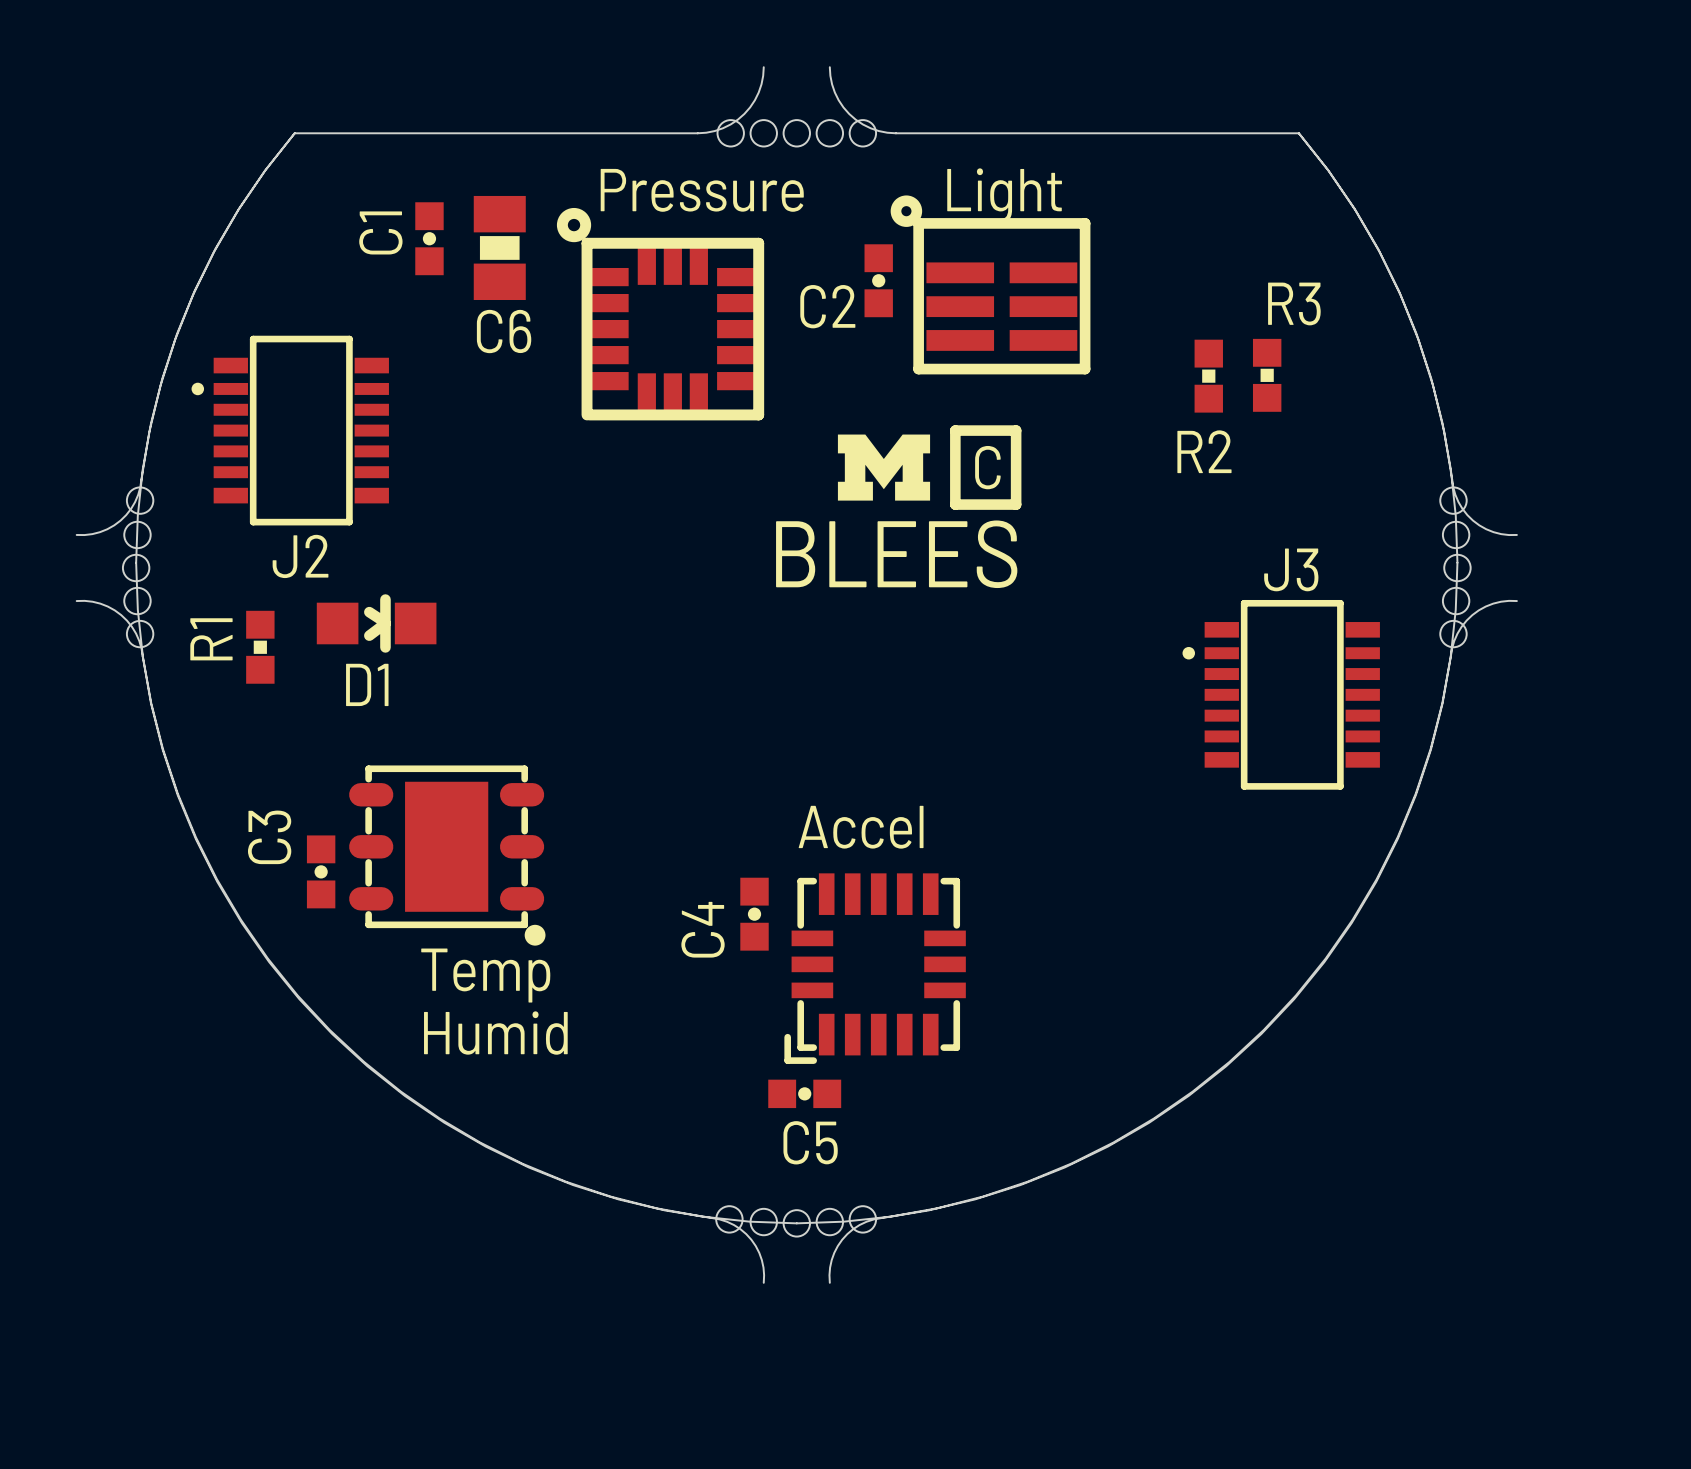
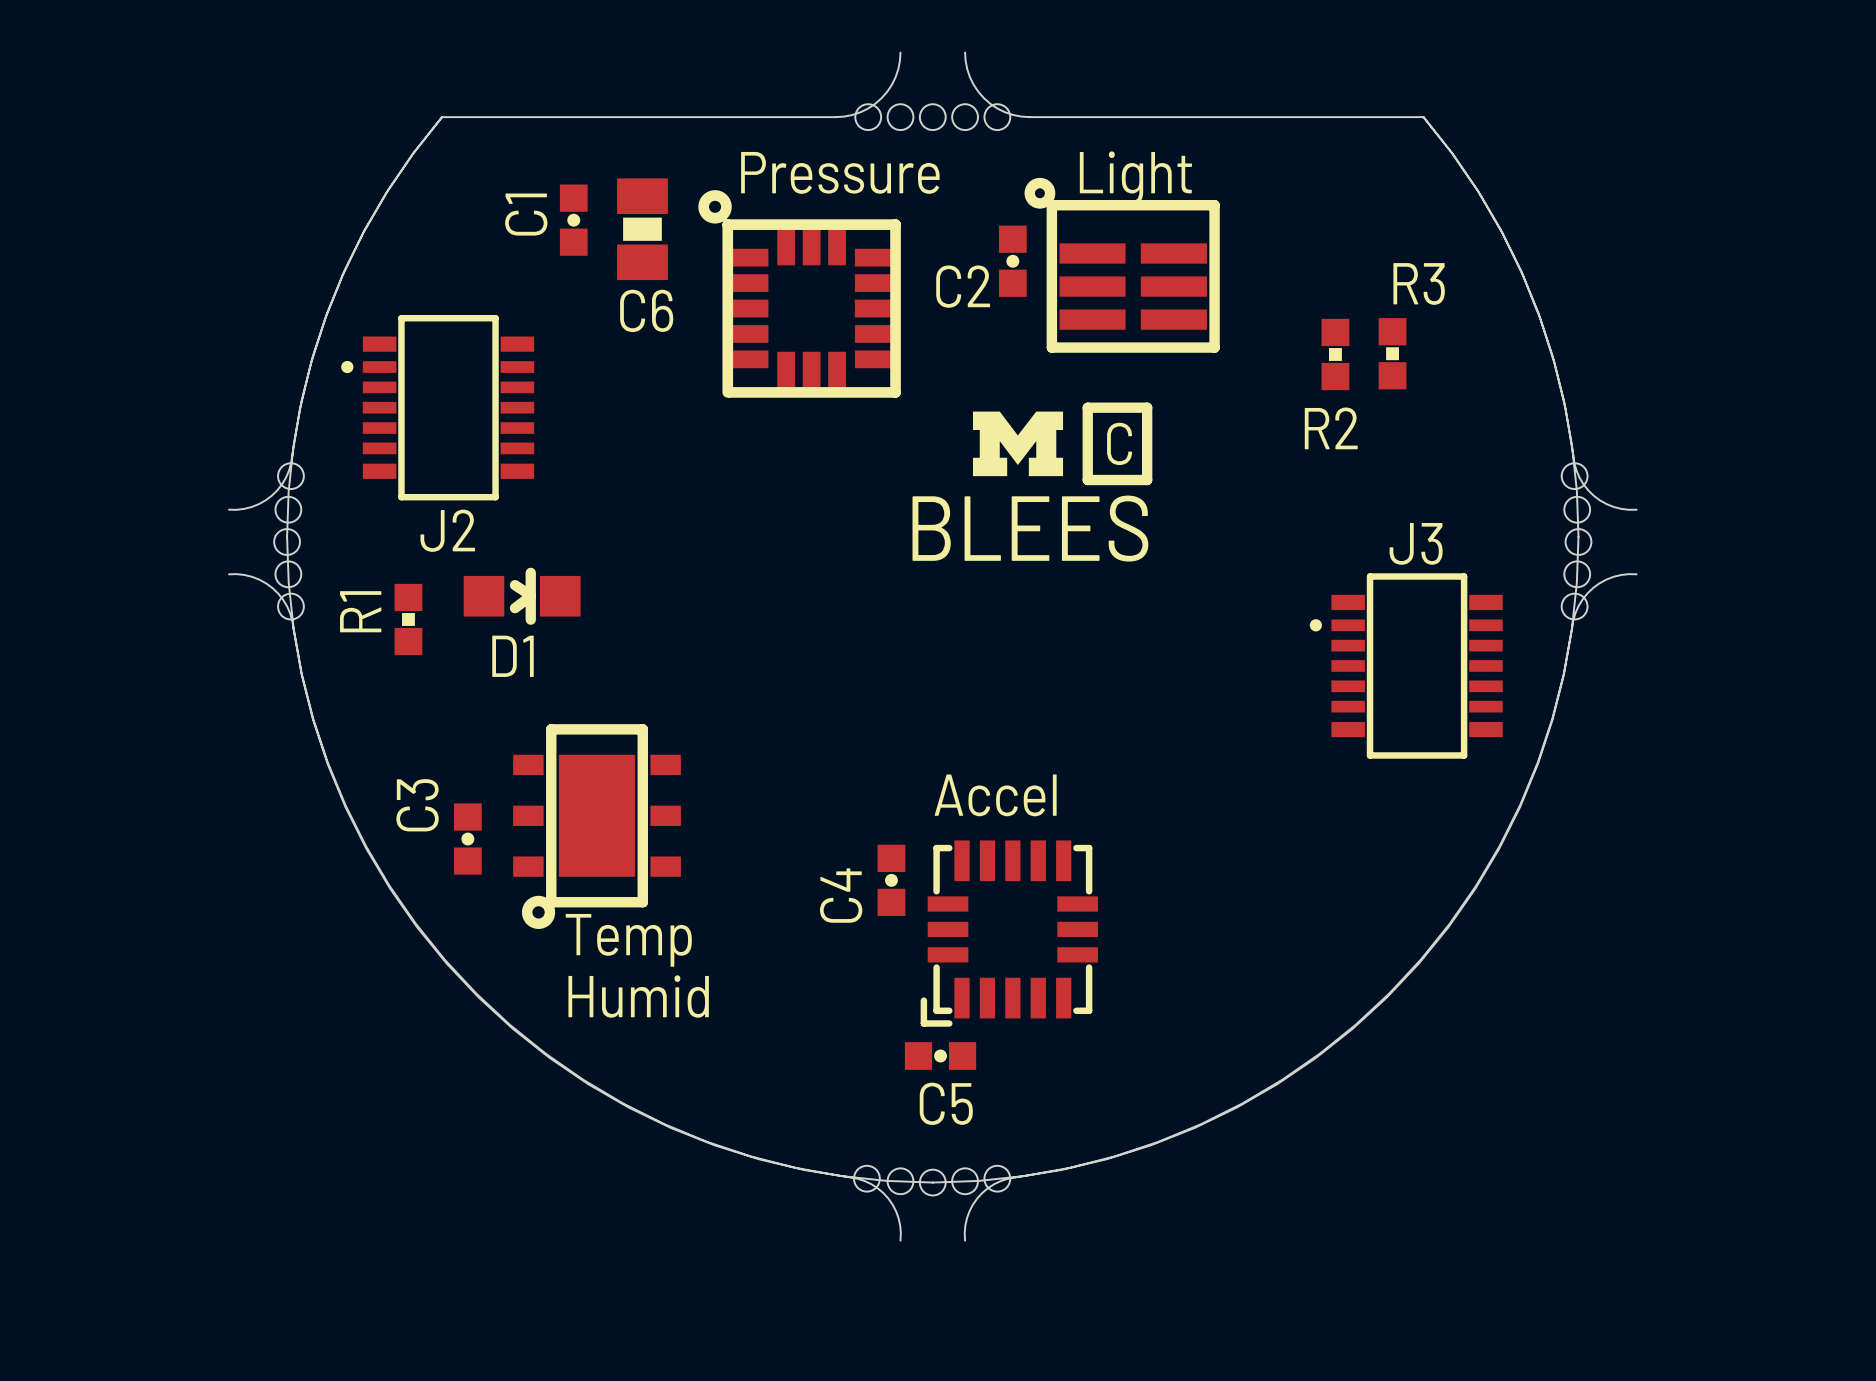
part footprint: [349, 765, 546, 946] -> [513, 724, 681, 929]

